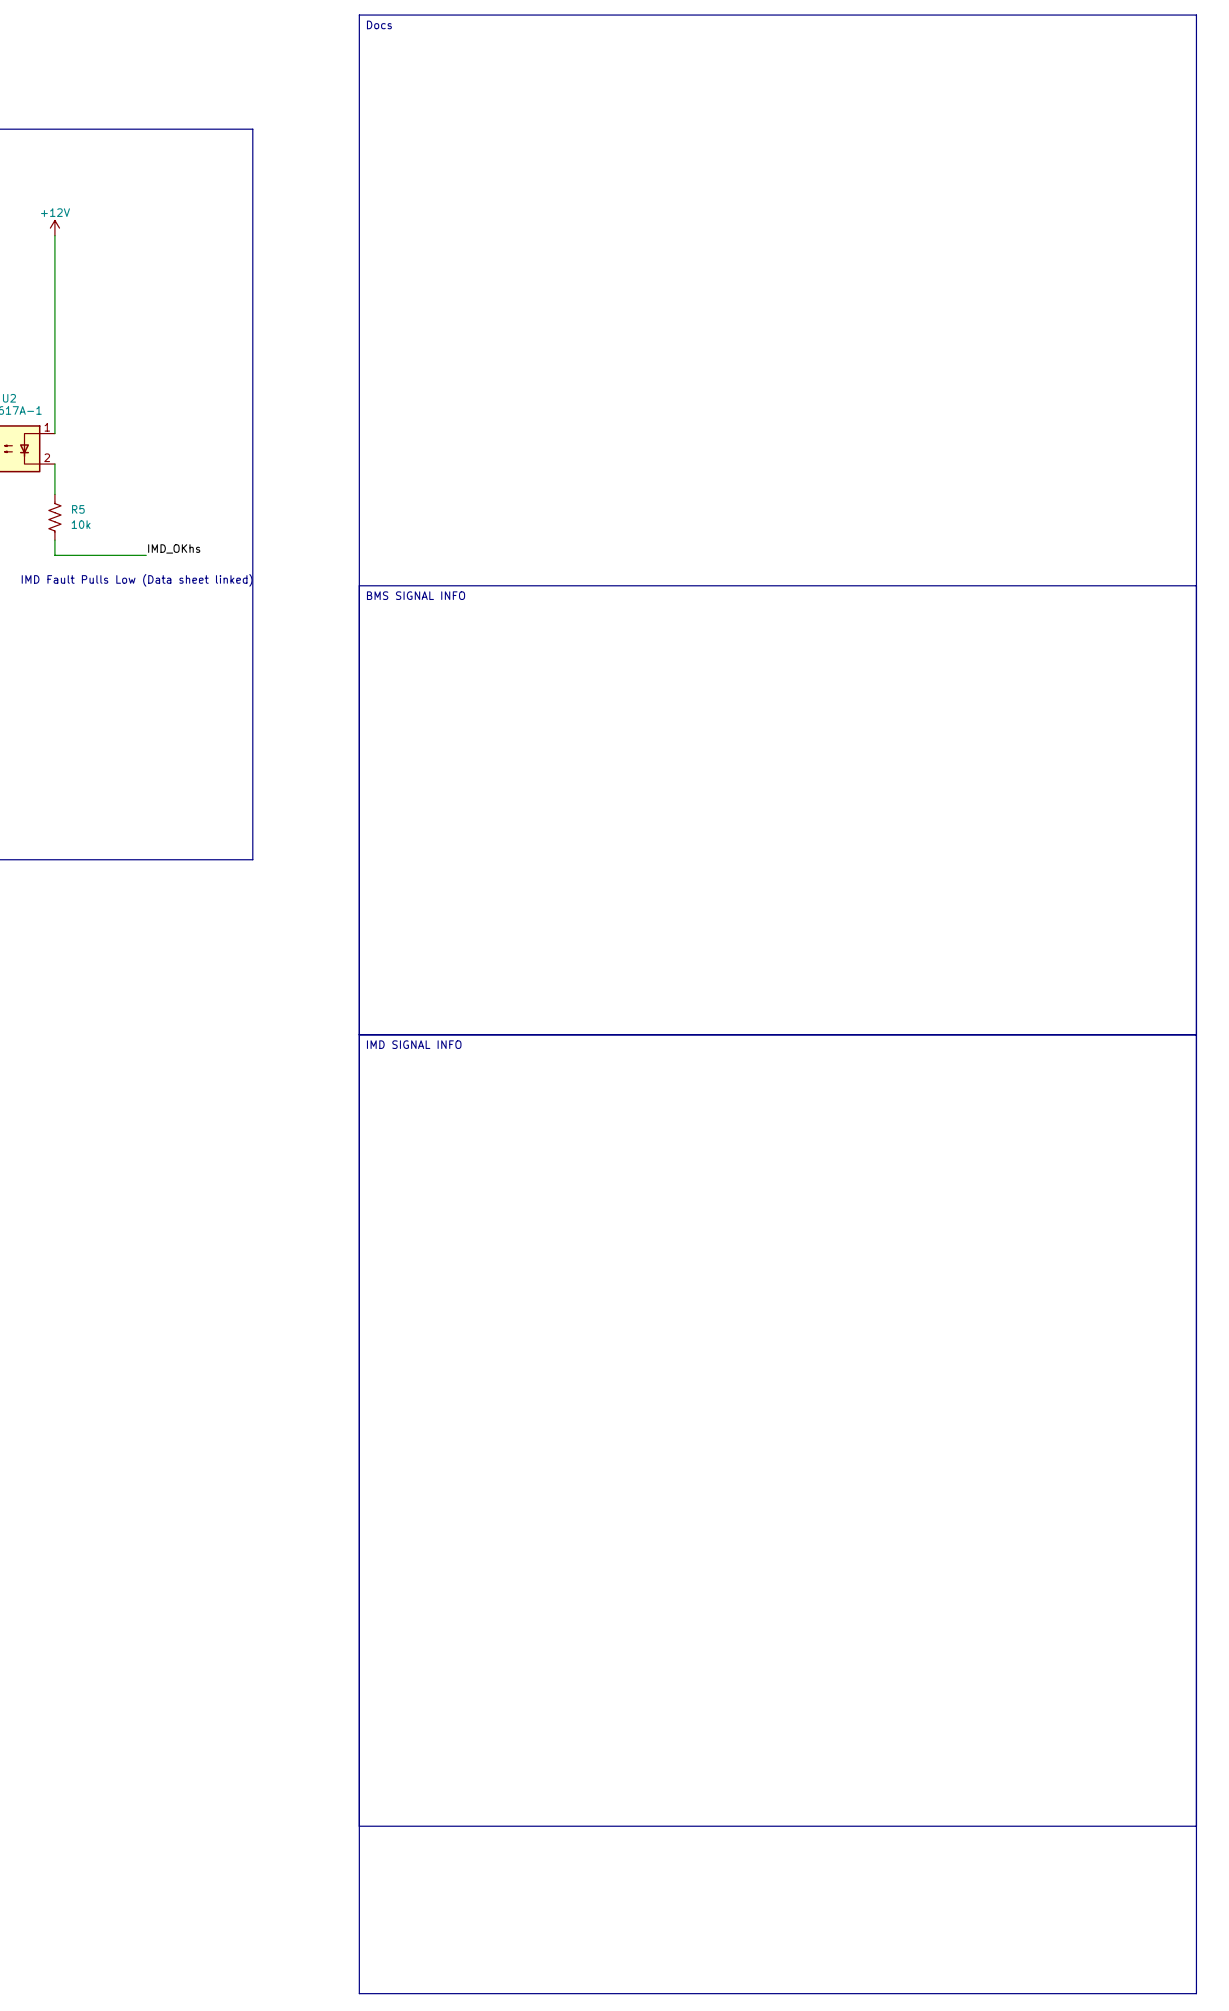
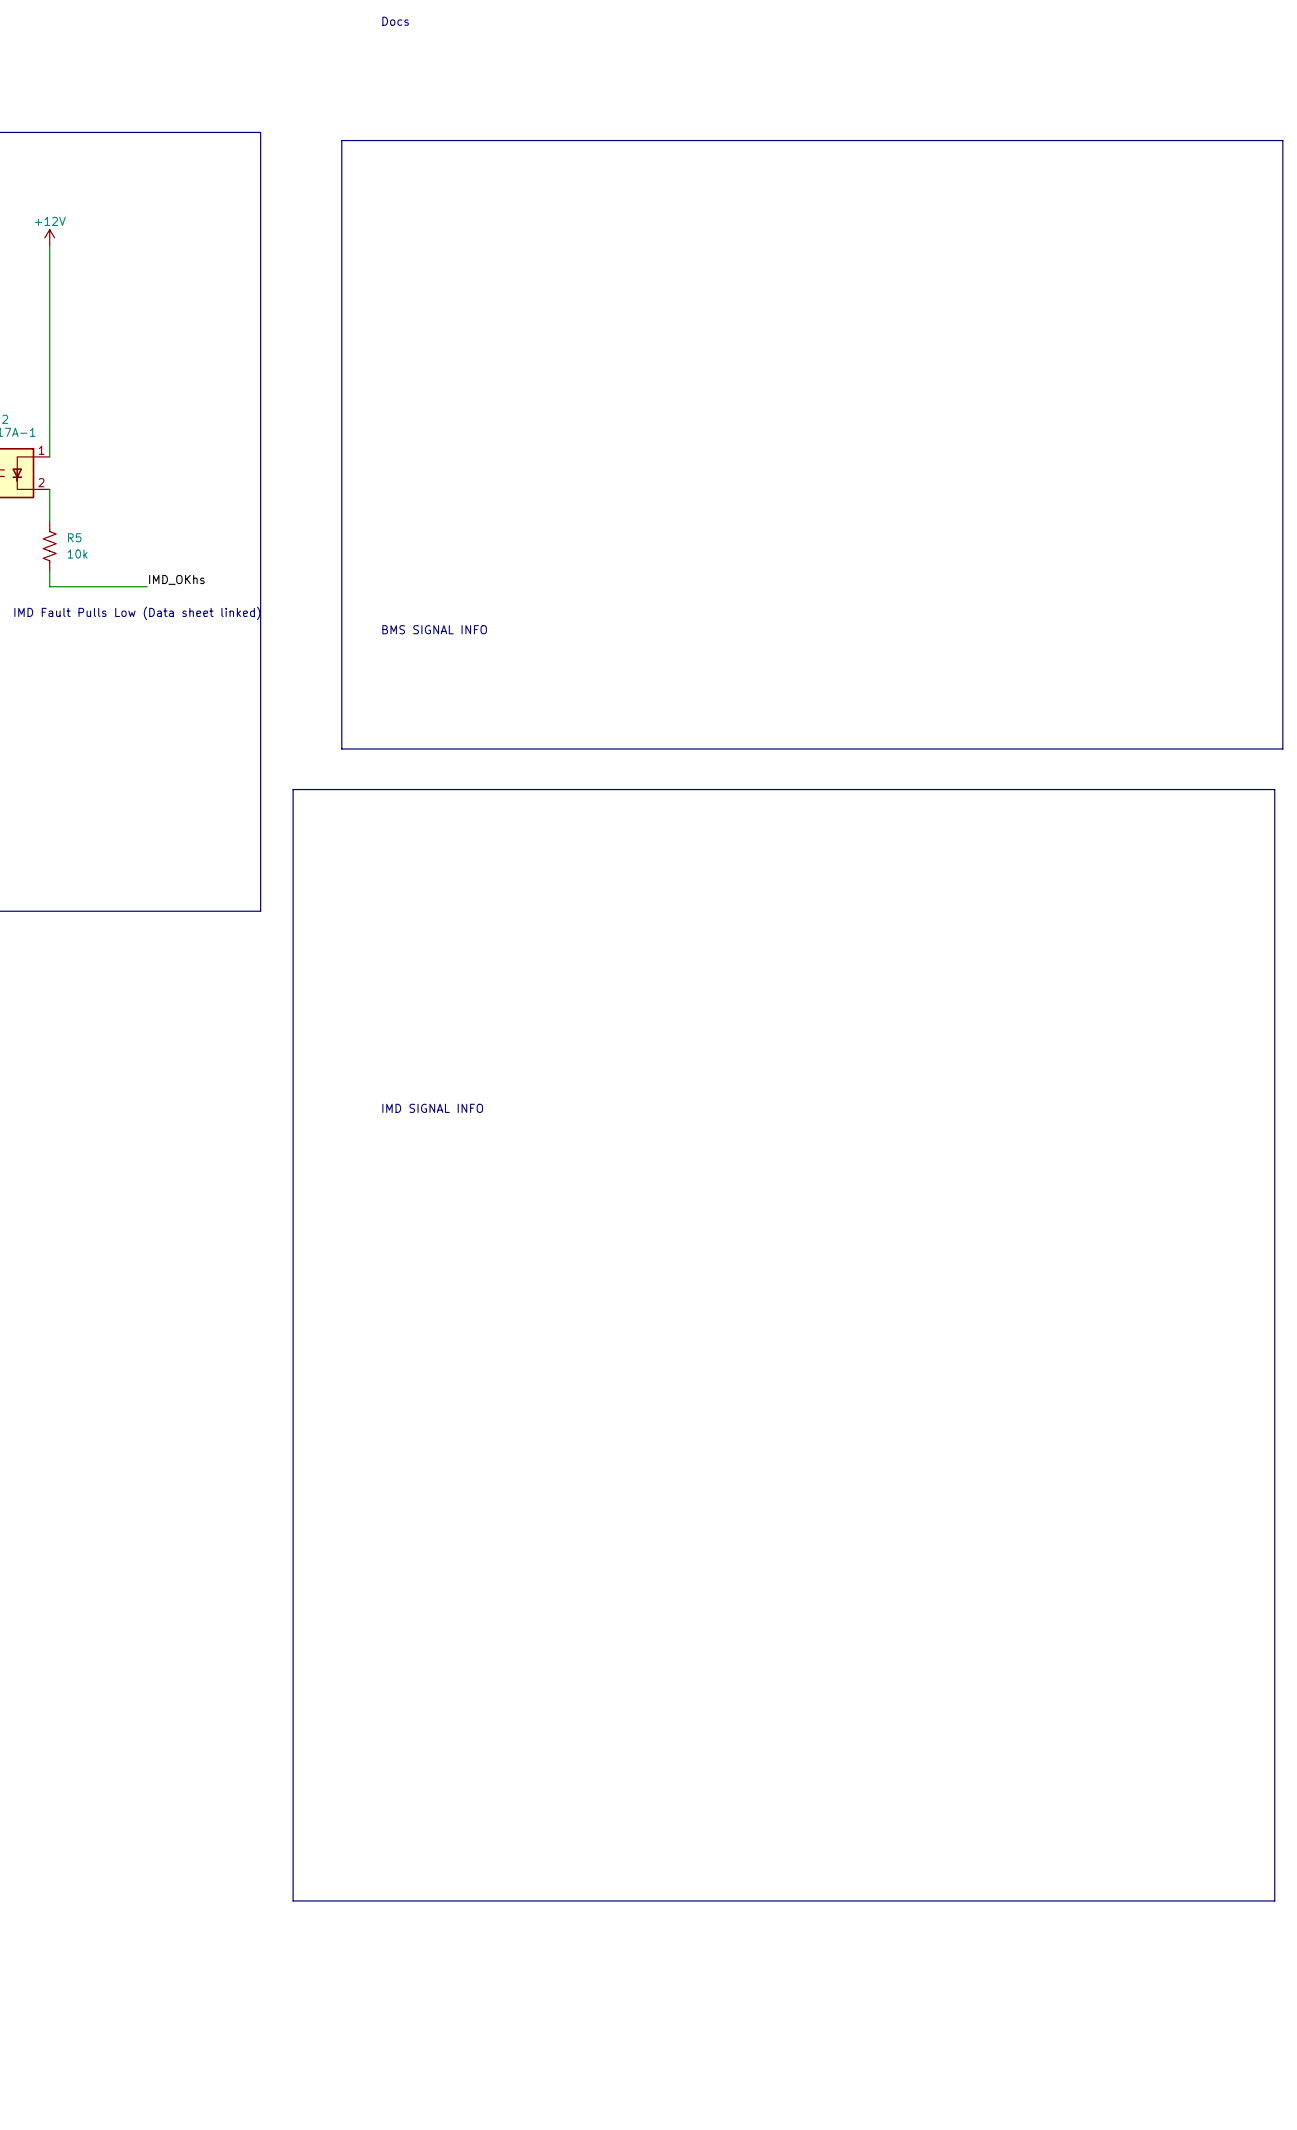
line: (359, 15) (359, 1993) (1196, 1993) (1196, 15) (359, 15) -> (293, 789) (293, 1900) (1274, 1900) (1274, 789) (293, 789)
line: none -> (341, 140) (1282, 140) (1282, 748) (341, 748) (341, 140)
line: (359, 585) (1196, 585) -> none
line: (359, 1034) (1196, 1034) -> none
line: (359, 1826) (1196, 1826) -> none

